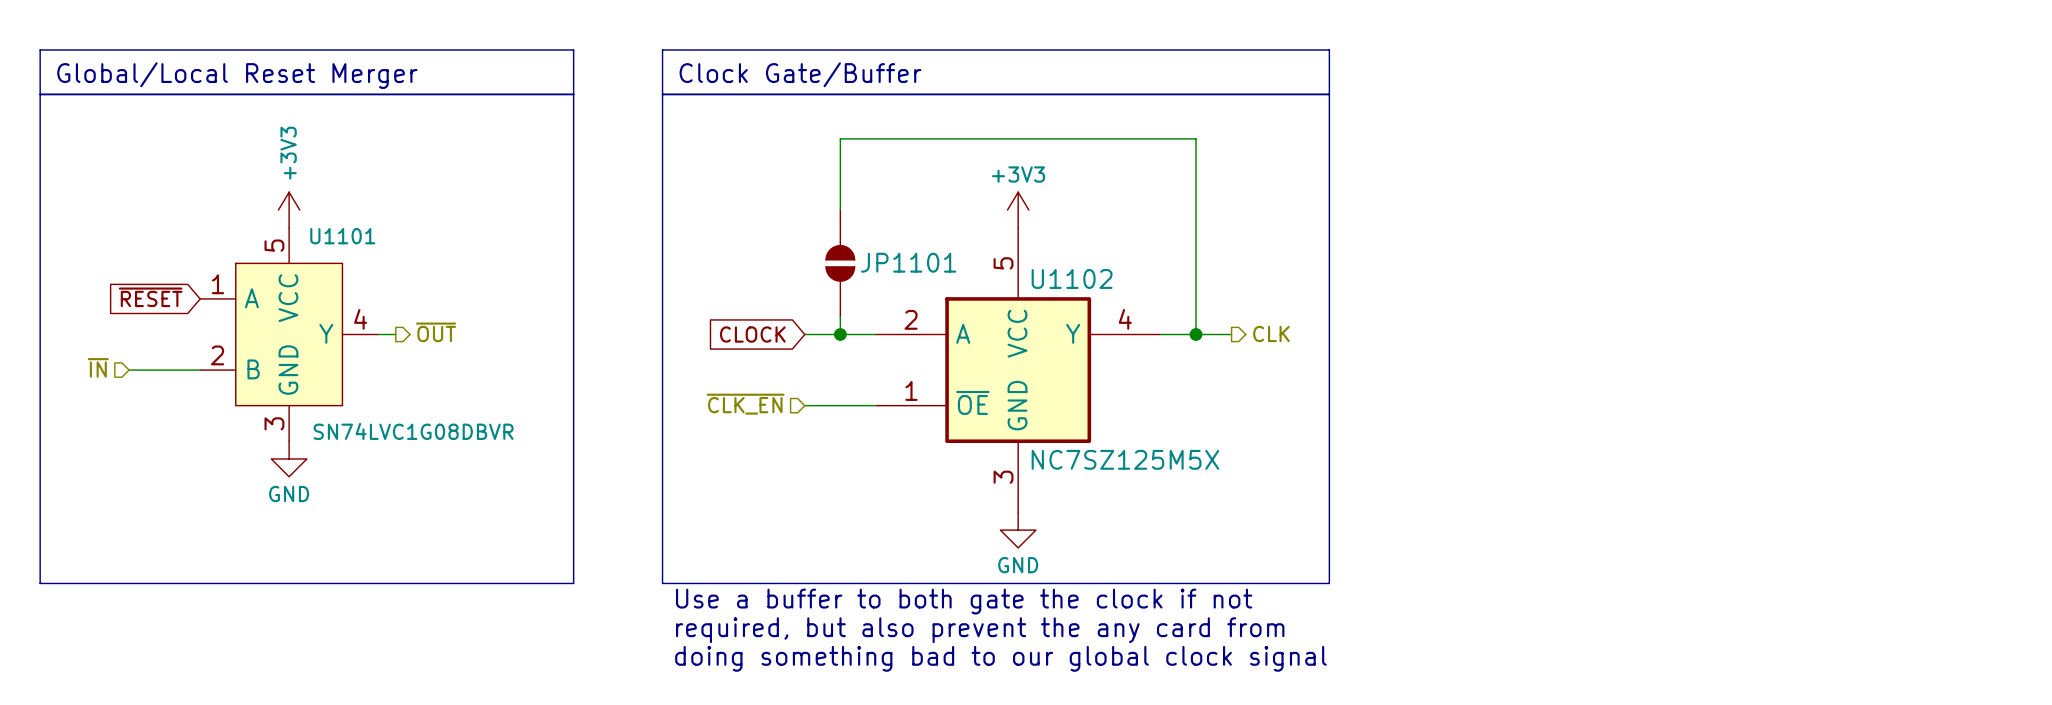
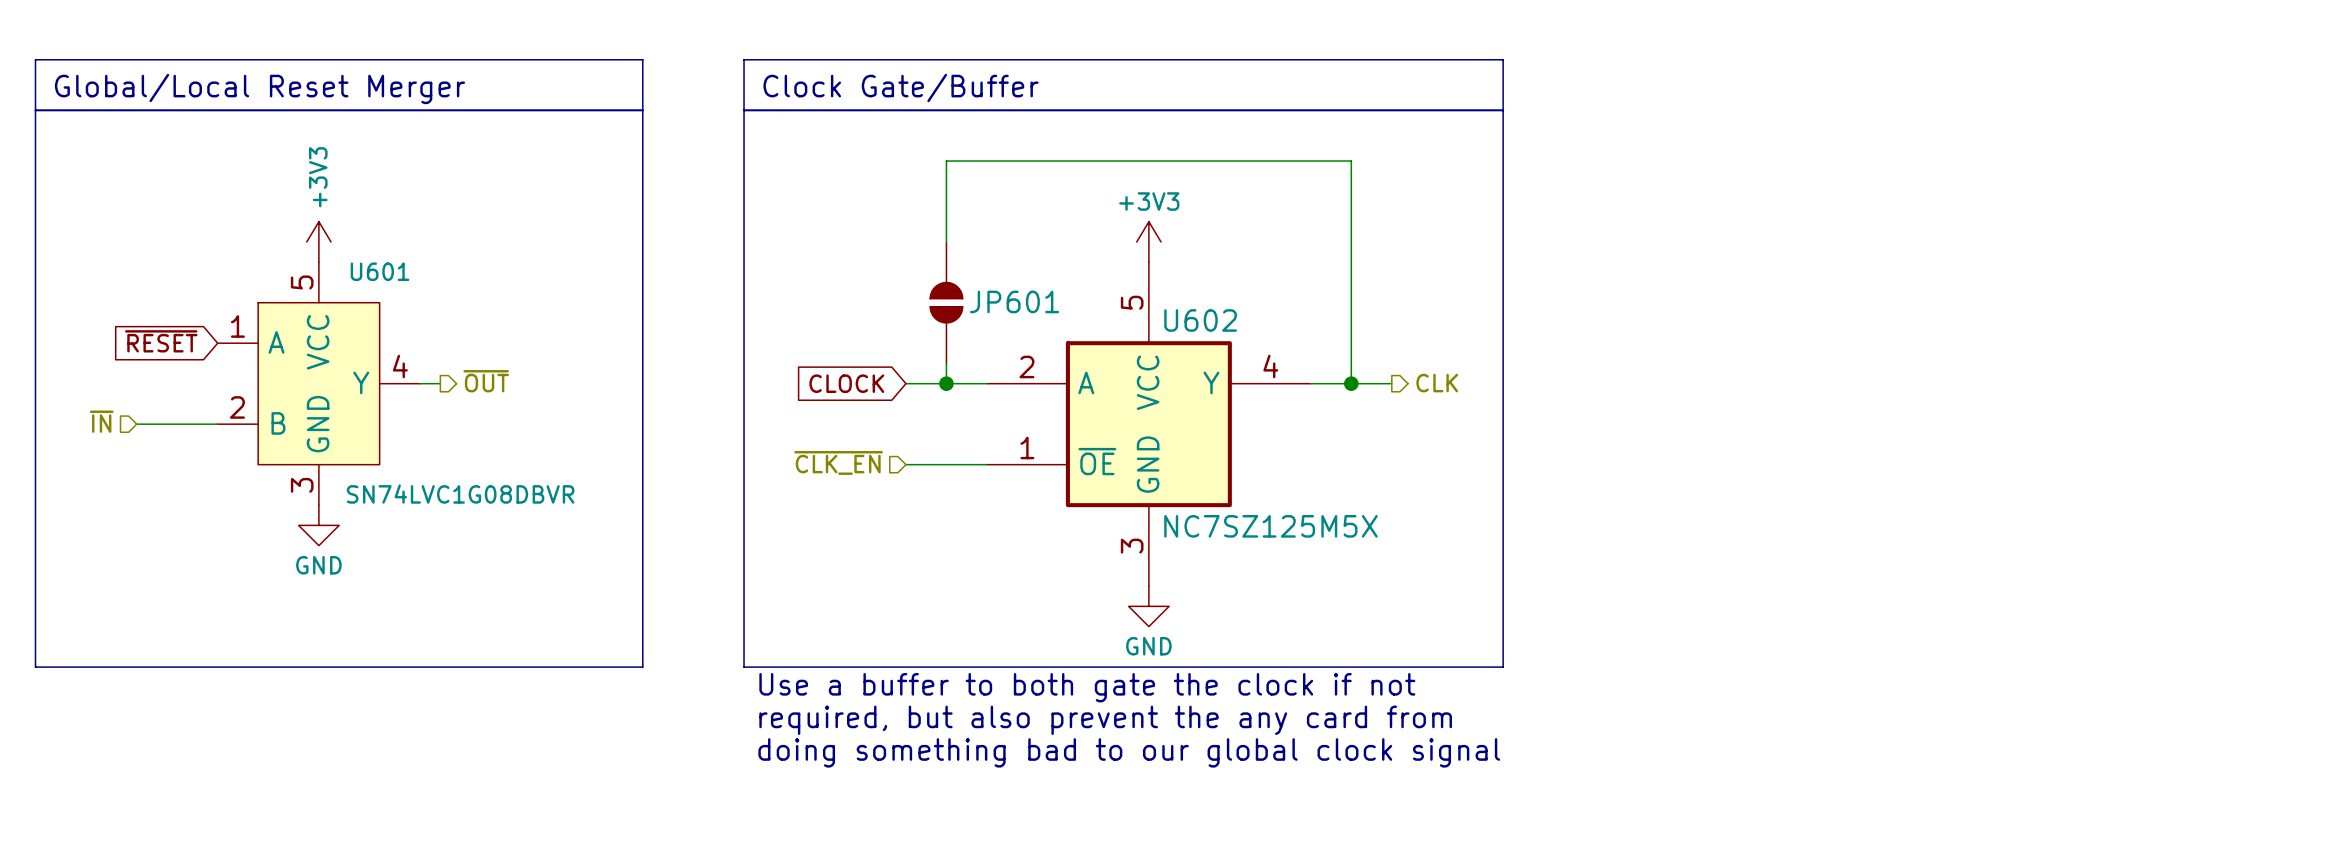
U1101 name: U1101 (342, 236) -> U601 (380, 271)
JP1101 name: JP1101 (908, 262) -> JP601 (1014, 301)
U1102 name: U1102 (1072, 278) -> U602 (1200, 320)

